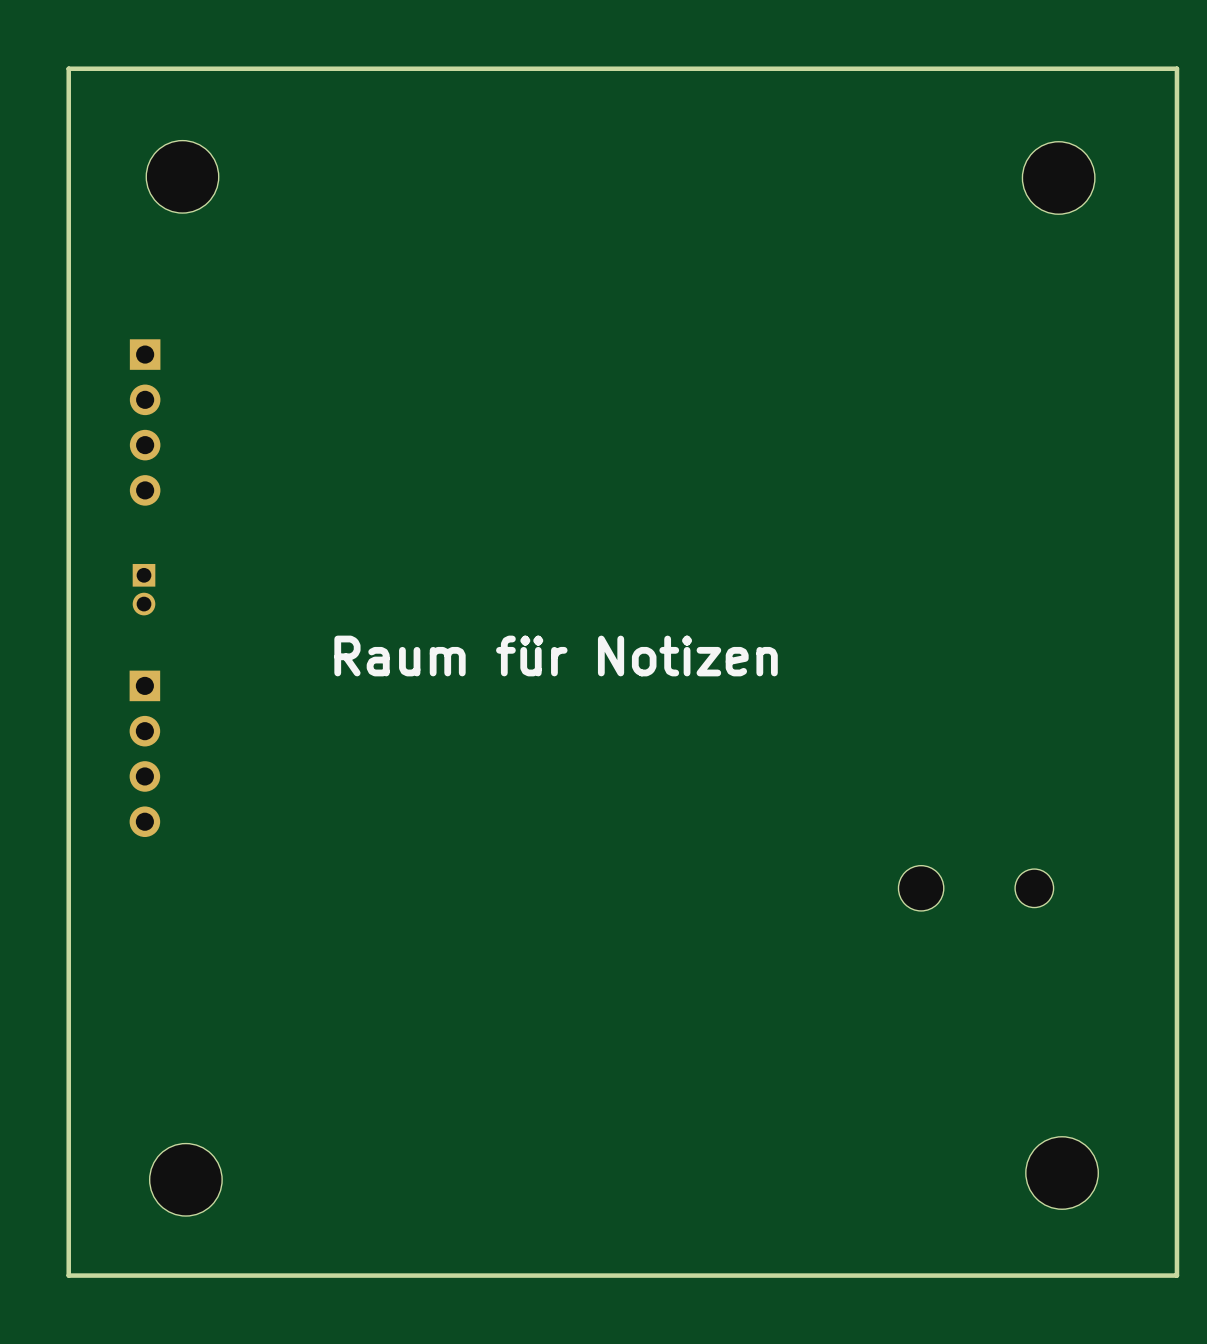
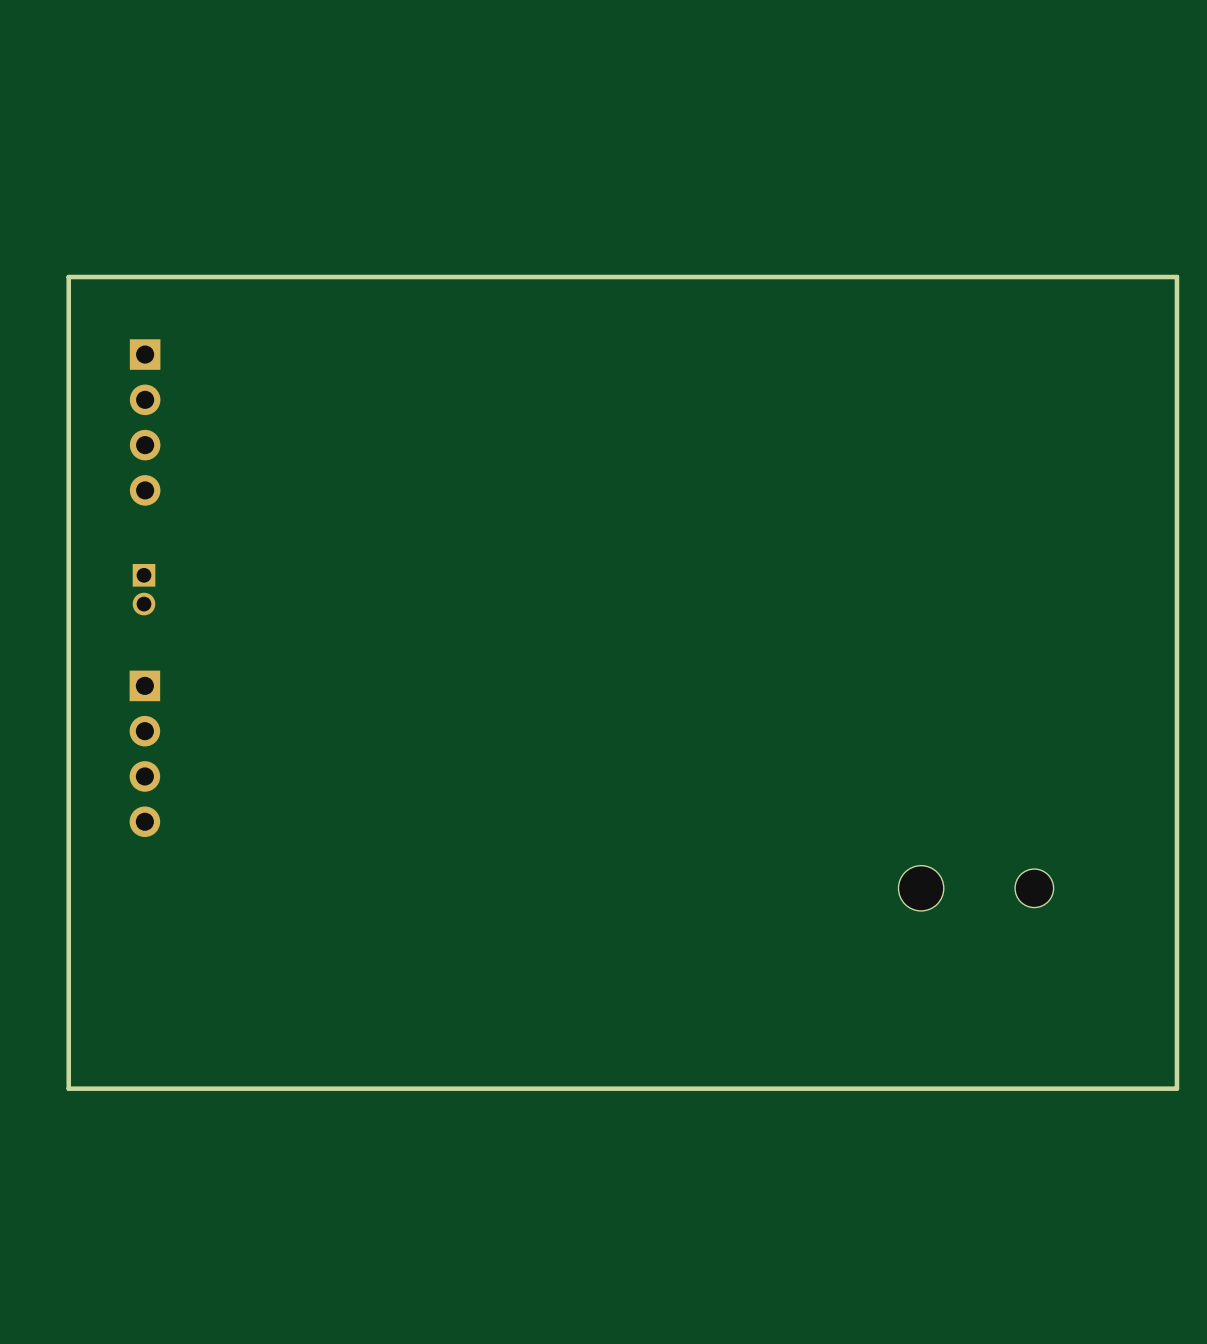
part: (182, 176) -> none
part: (1058, 177) -> none
board edge: (1176, 277) (1176, 68) (68, 68) (68, 277) -> (1176, 277) (68, 277)
text: Raum für Notizen (556, 655) -> none
board edge: (1176, 1088) (1176, 1275) (68, 1275) (68, 1088) -> (1176, 1088) (68, 1088)
part: (1062, 1173) -> none
part: (185, 1179) -> none

